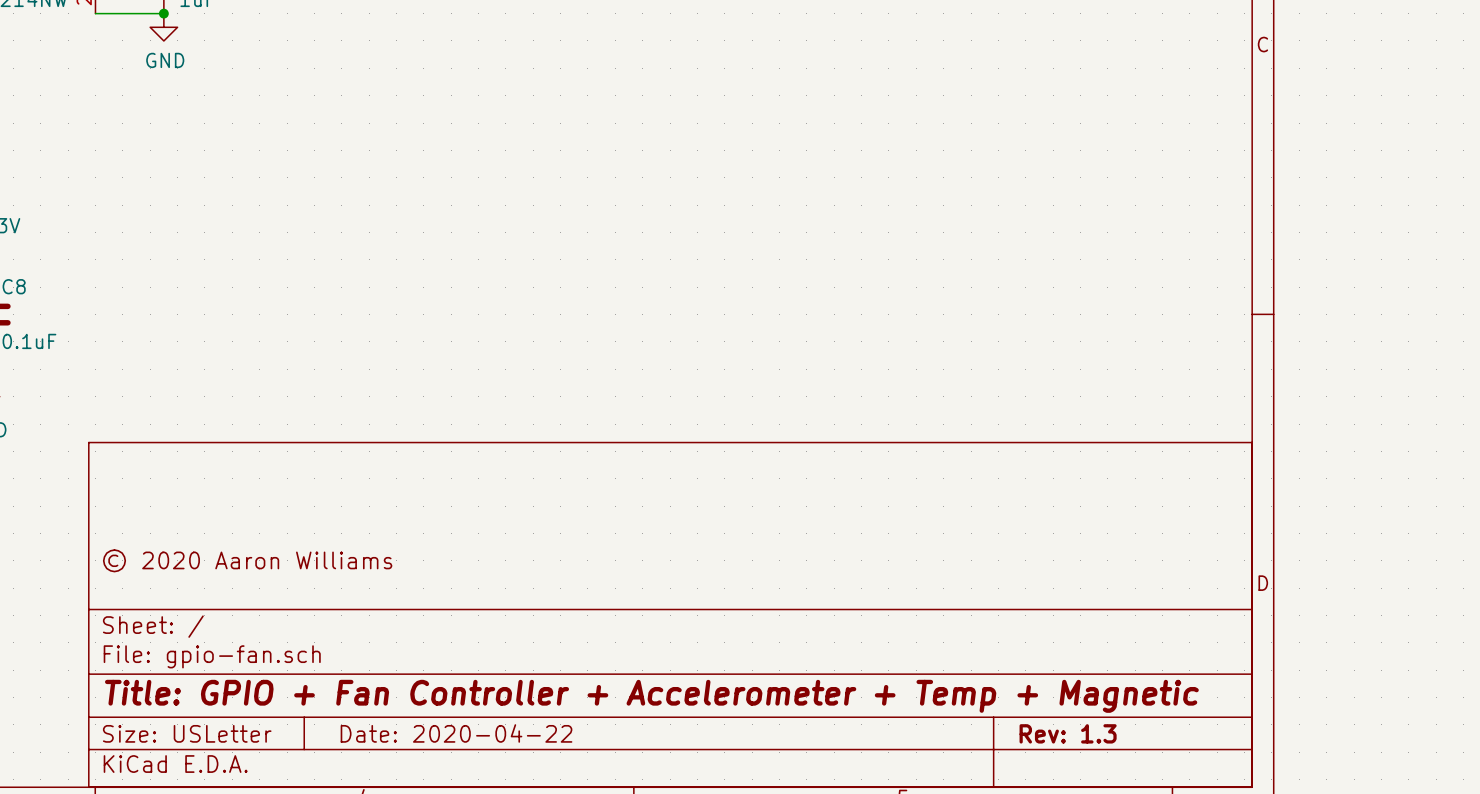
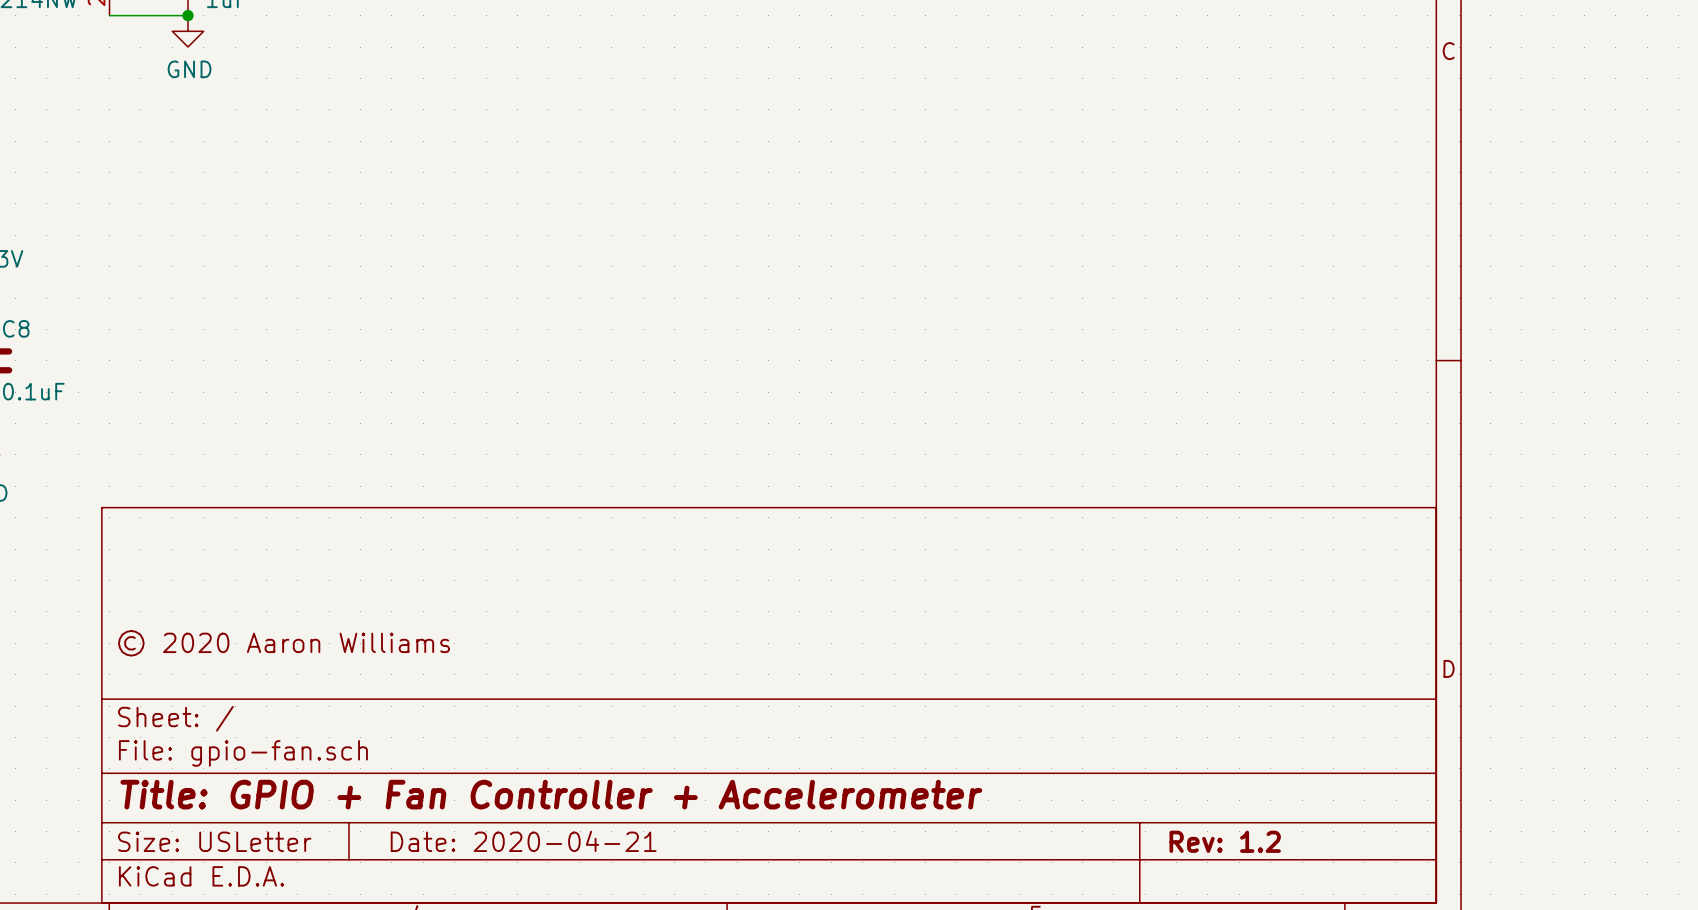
title block: Title: GPIO + Fan Controller + Accelerometer + Temp + Magnetic (651, 696) -> Title: GPIO + Fan Controller + Accelerometer (551, 794)
title block: Date: 2020-04-22 (456, 733) -> Date: 2020-04-21 (523, 841)
title block: Rev: 1.3 (1068, 733) -> Rev: 1.2 (1225, 841)

